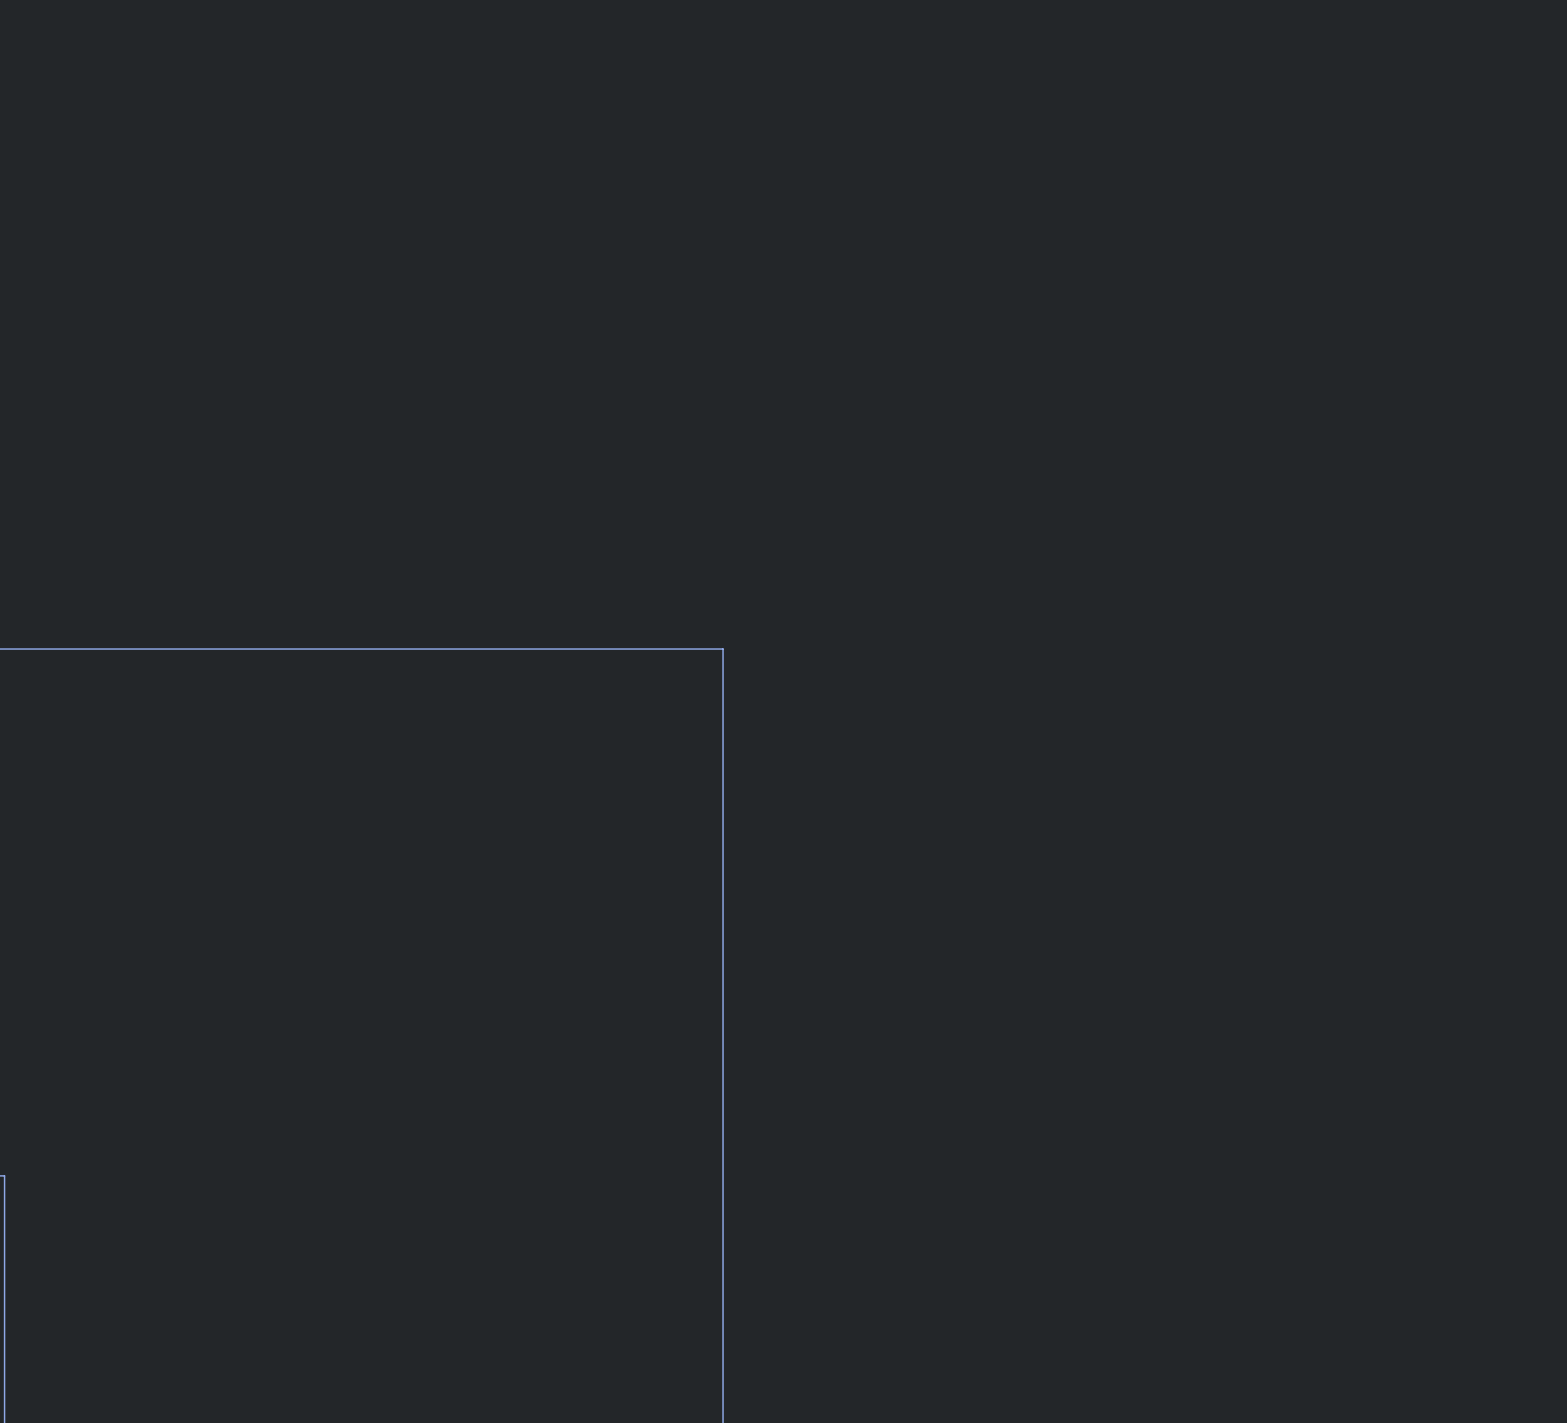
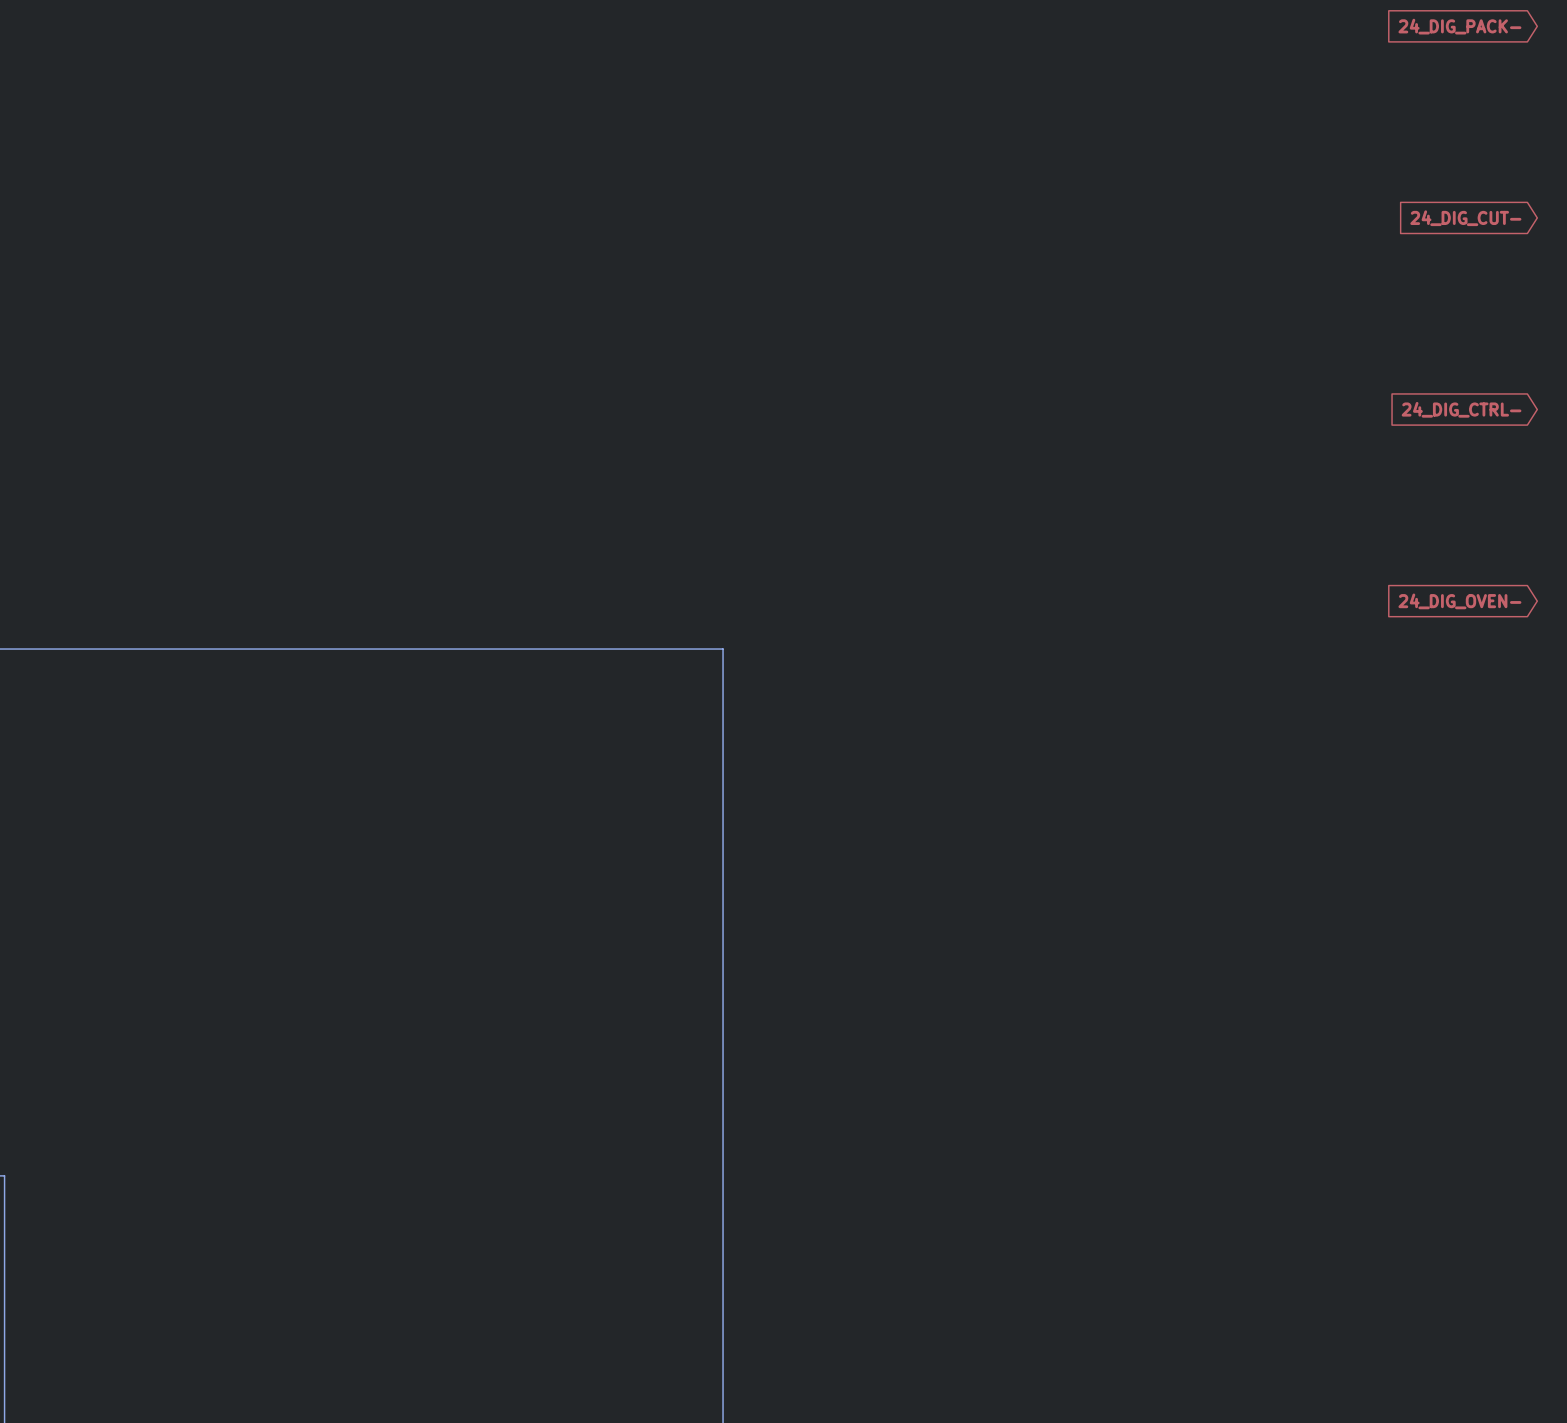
global label: none -> 24_DIG_PACK- (1459, 26)
global label: none -> 24_DIG_CUT- (1465, 218)
global label: none -> 24_DIG_CTRL- (1461, 409)
global label: none -> 24_DIG_OVEN- (1459, 601)

